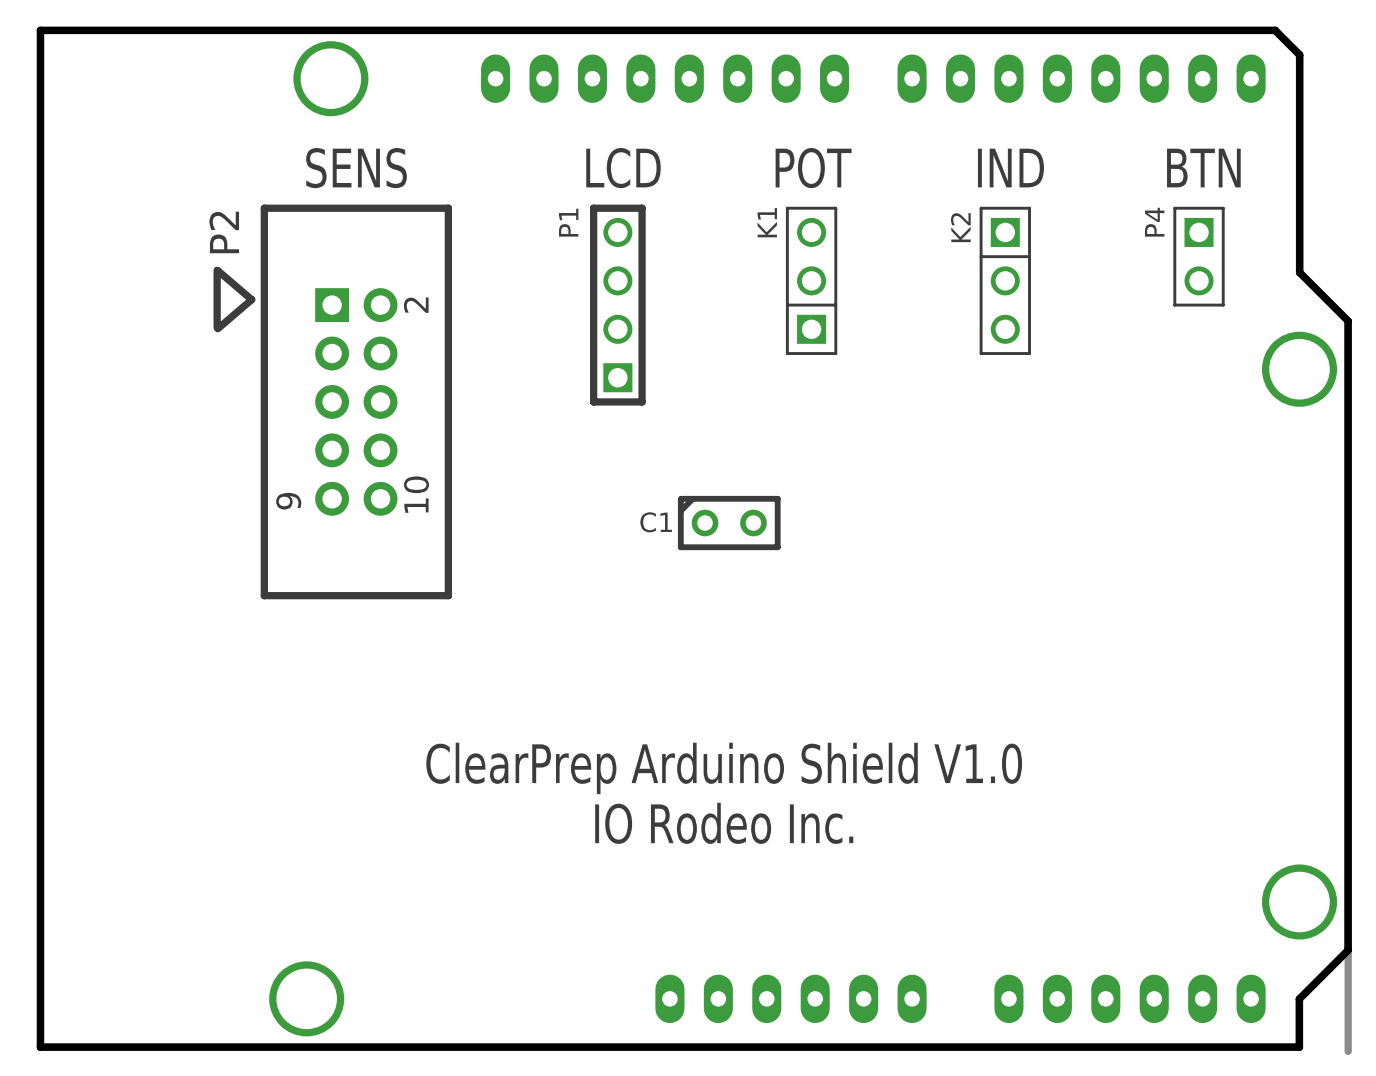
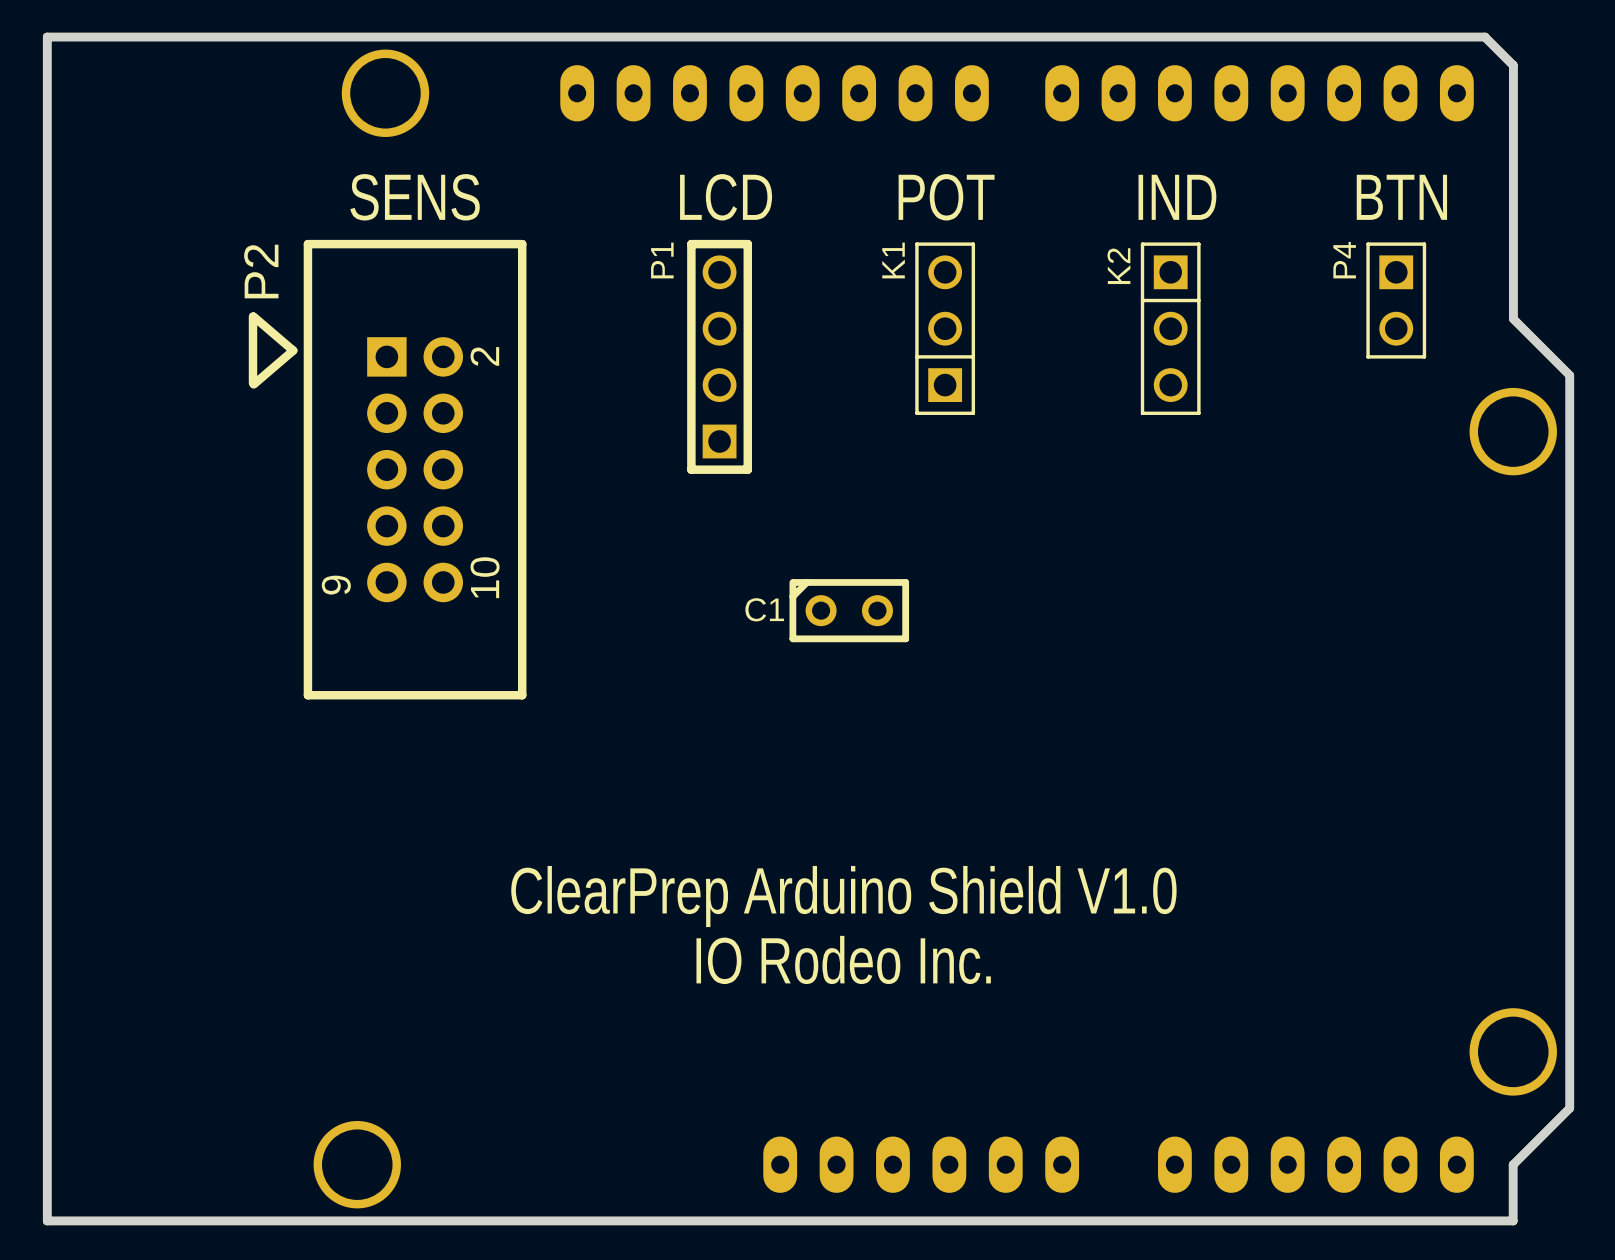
line: (1348, 947) (1348, 1051) -> none

